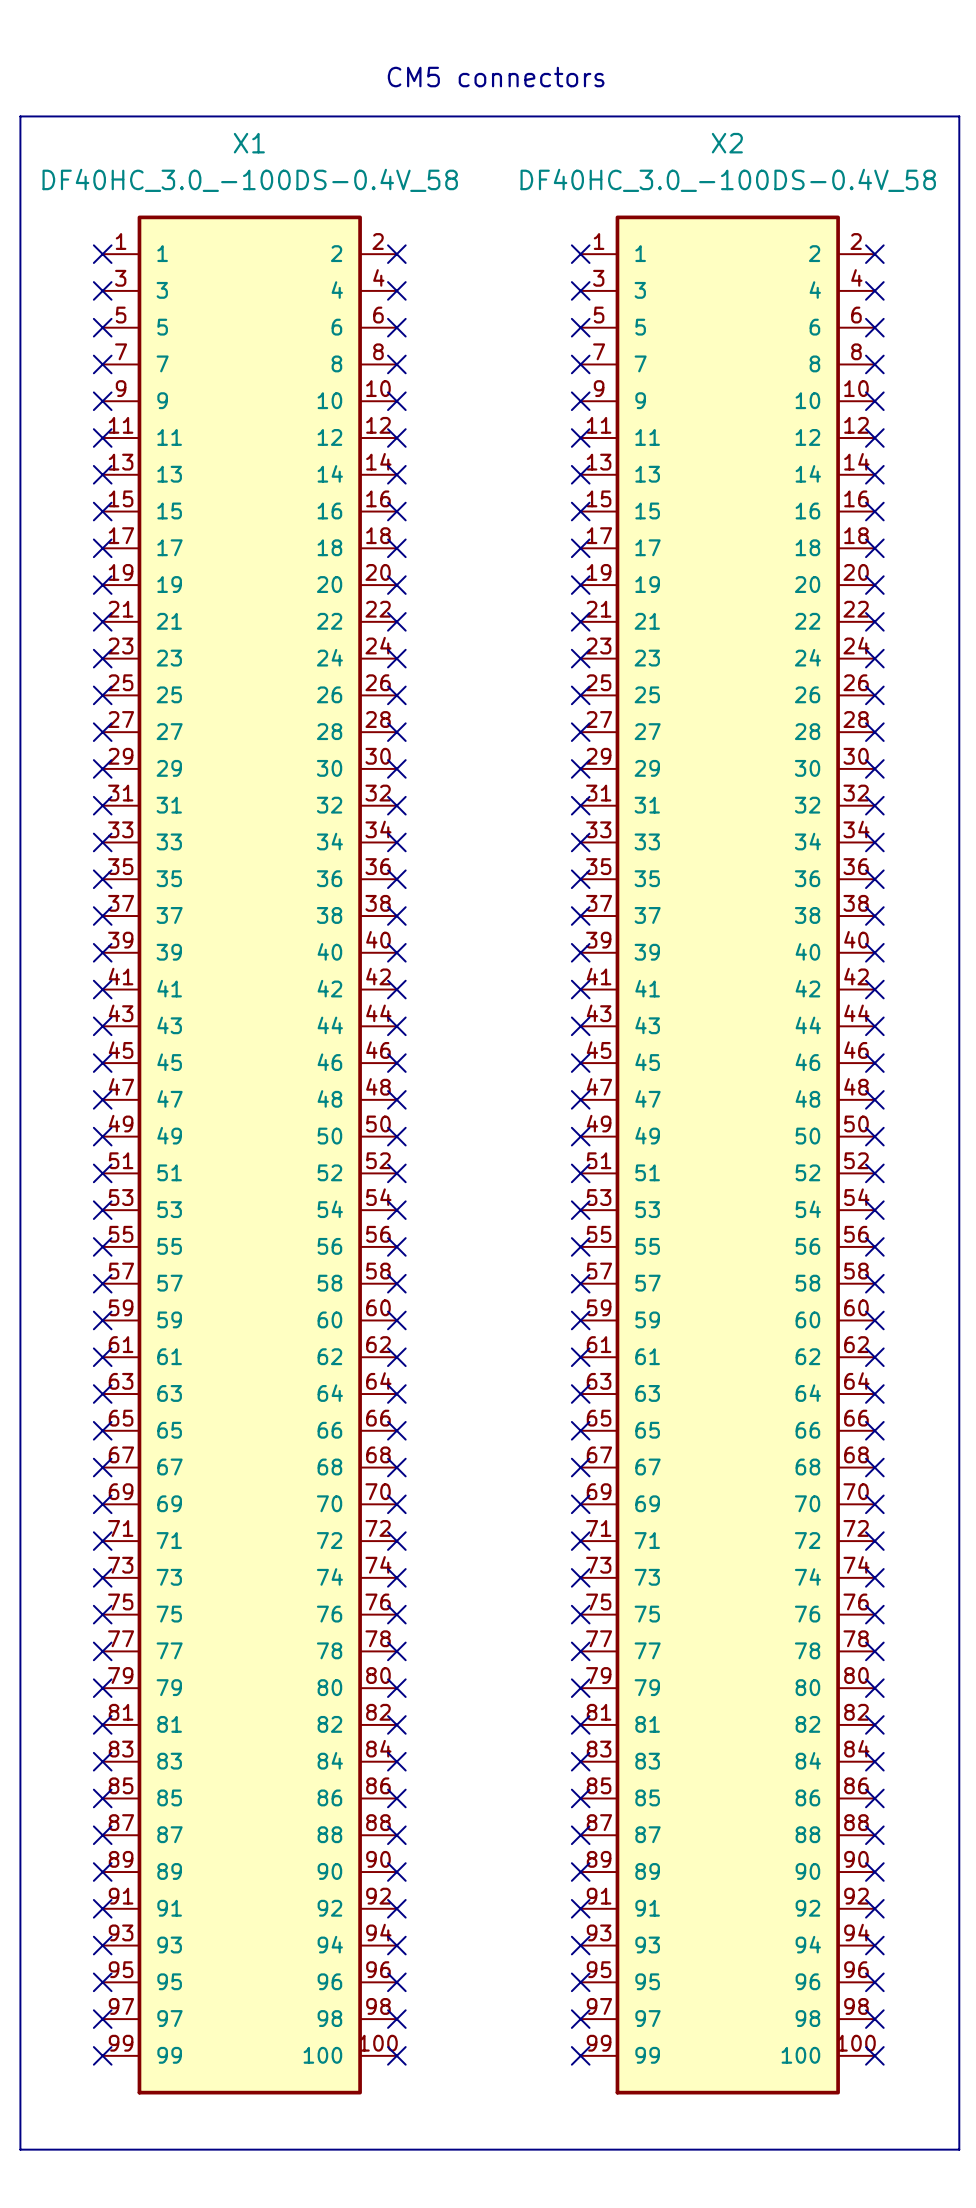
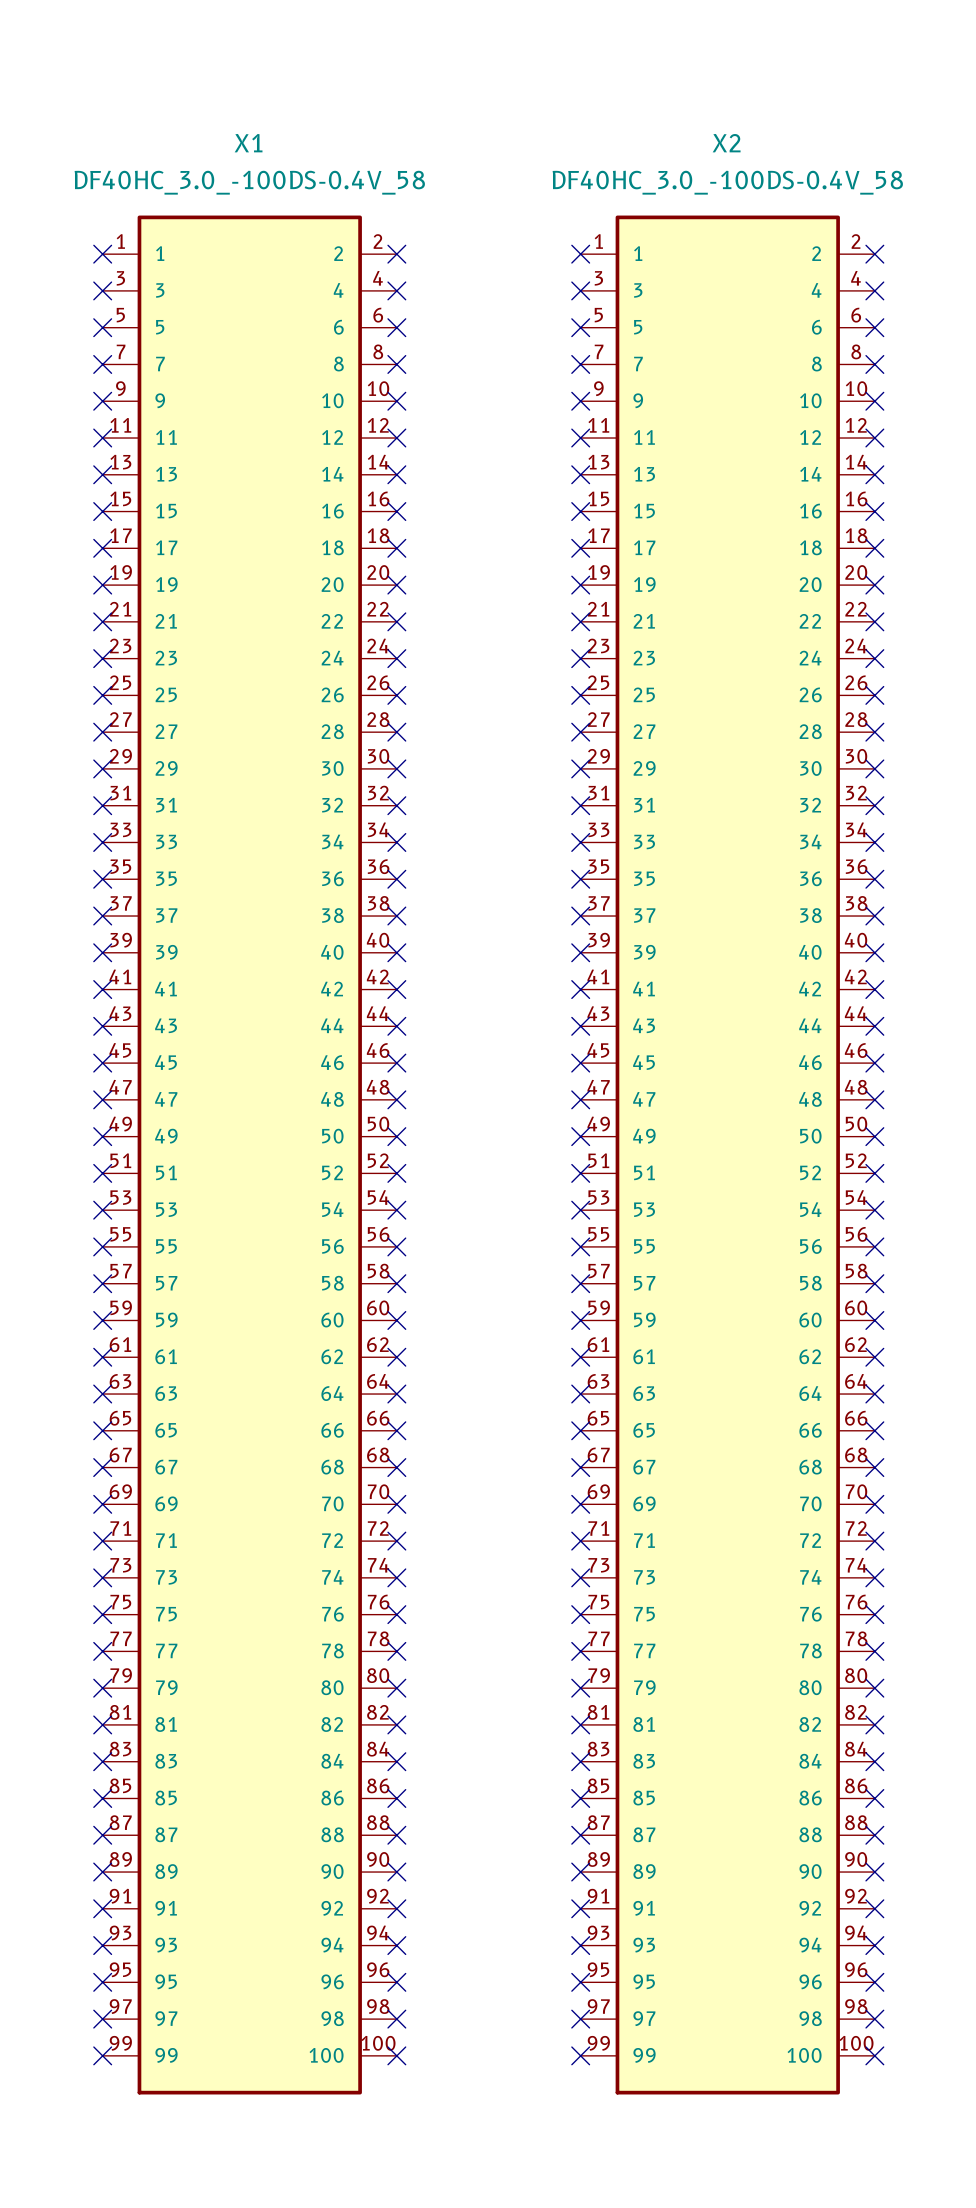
text: CM5 connectors (496, 77) -> none
line: (20, 116) (959, 116) (959, 2149) (20, 2149) (20, 116) -> none

